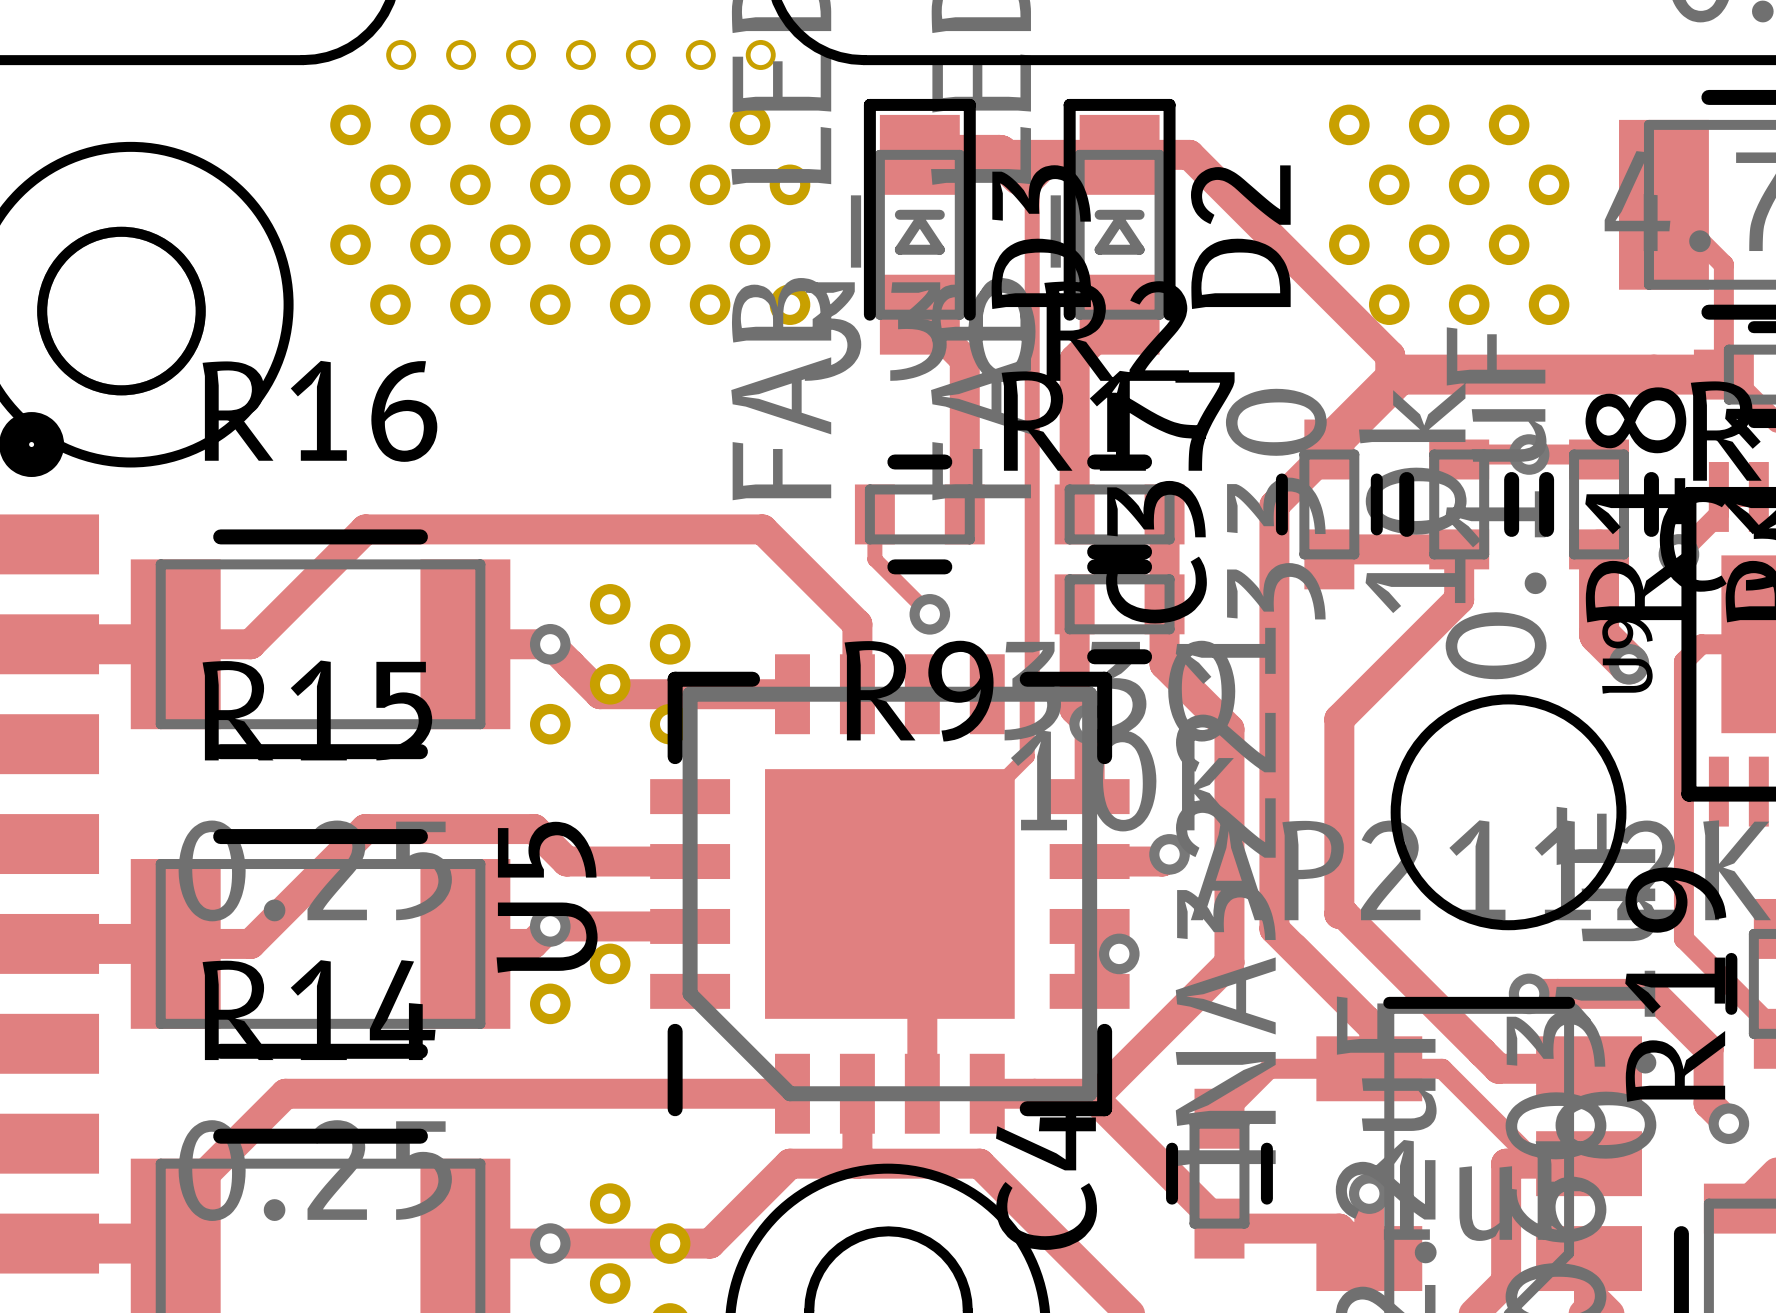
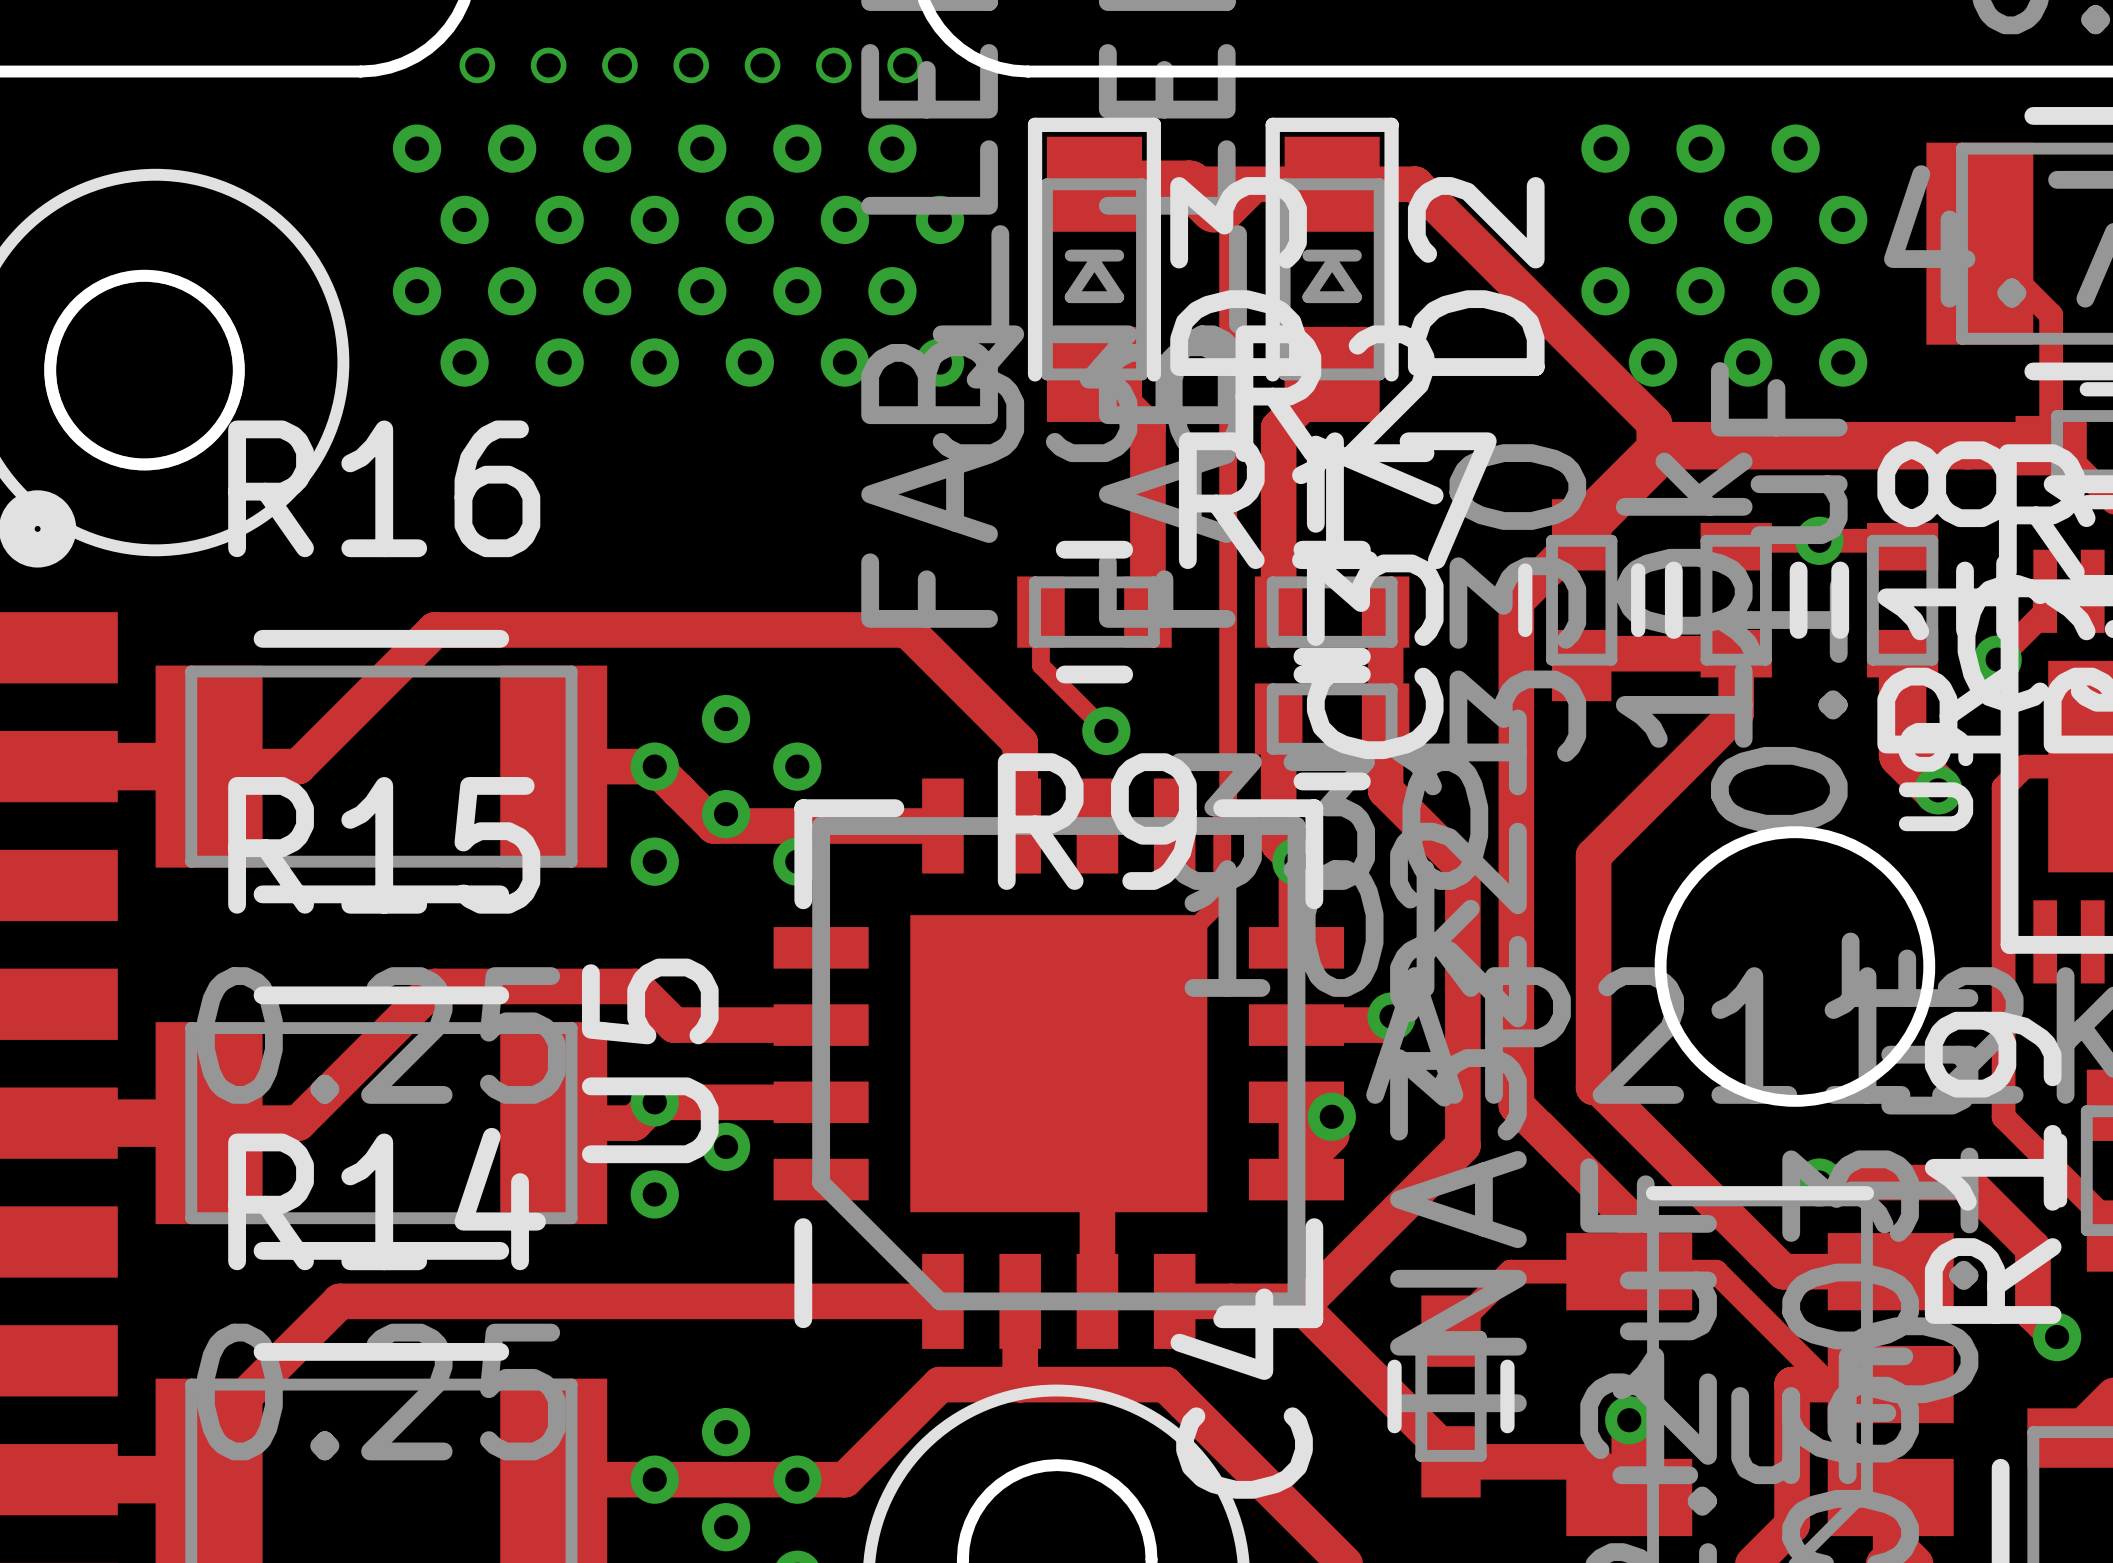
via position: (1119, 953) -> (1331, 1116)

